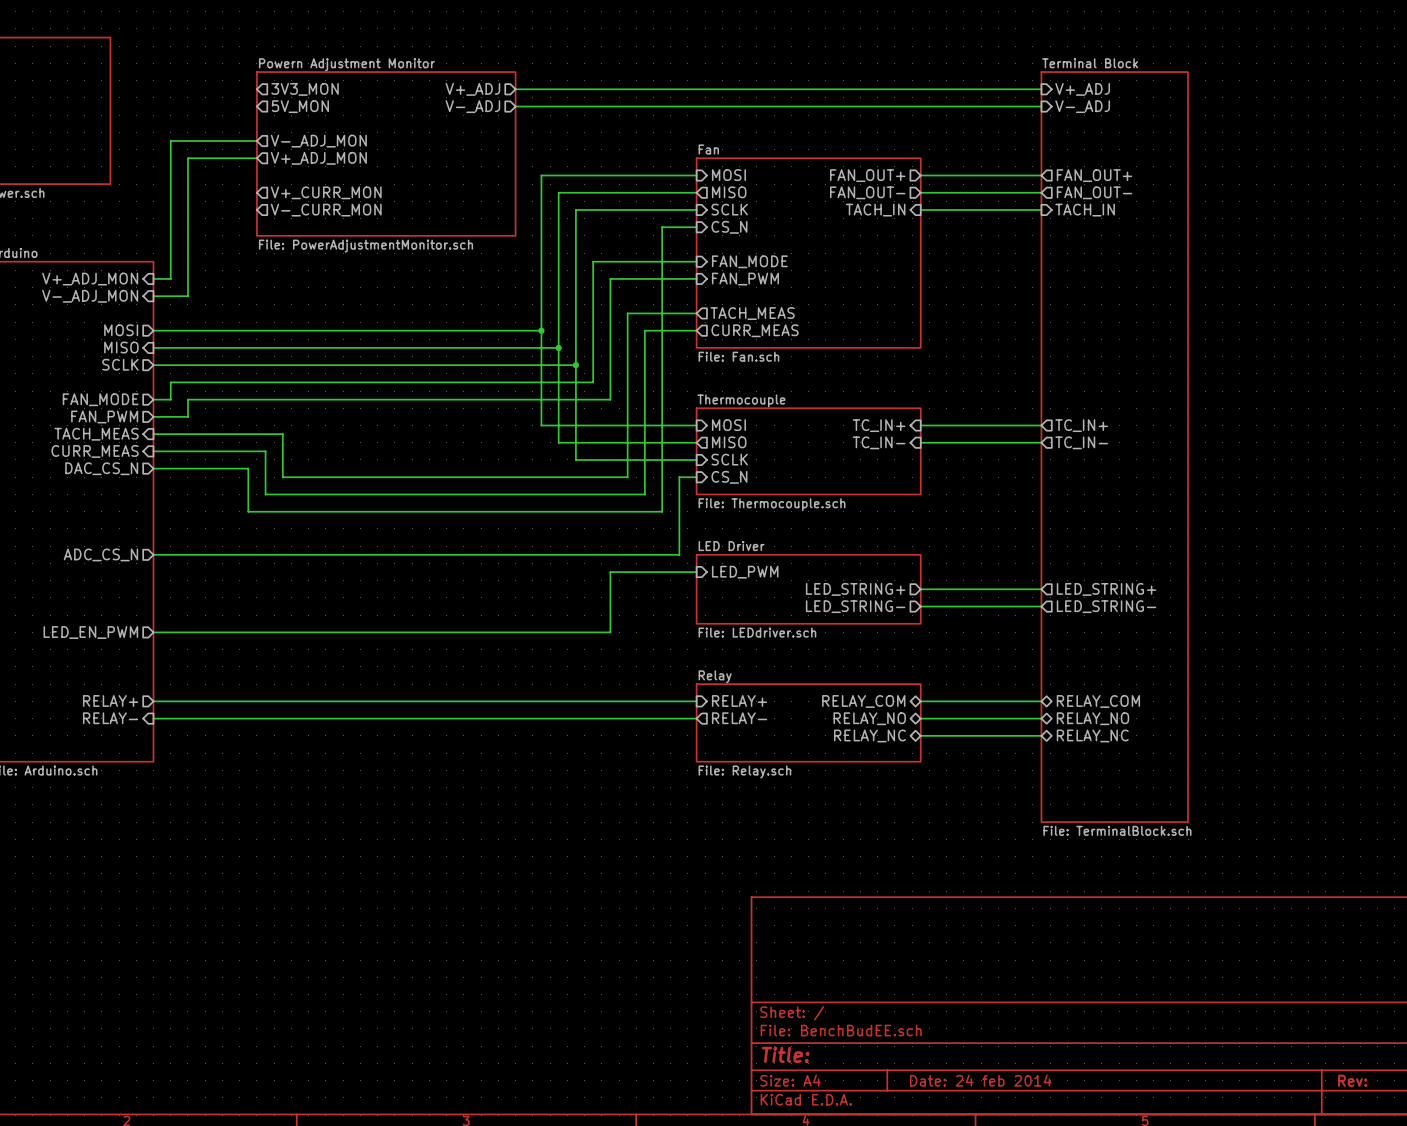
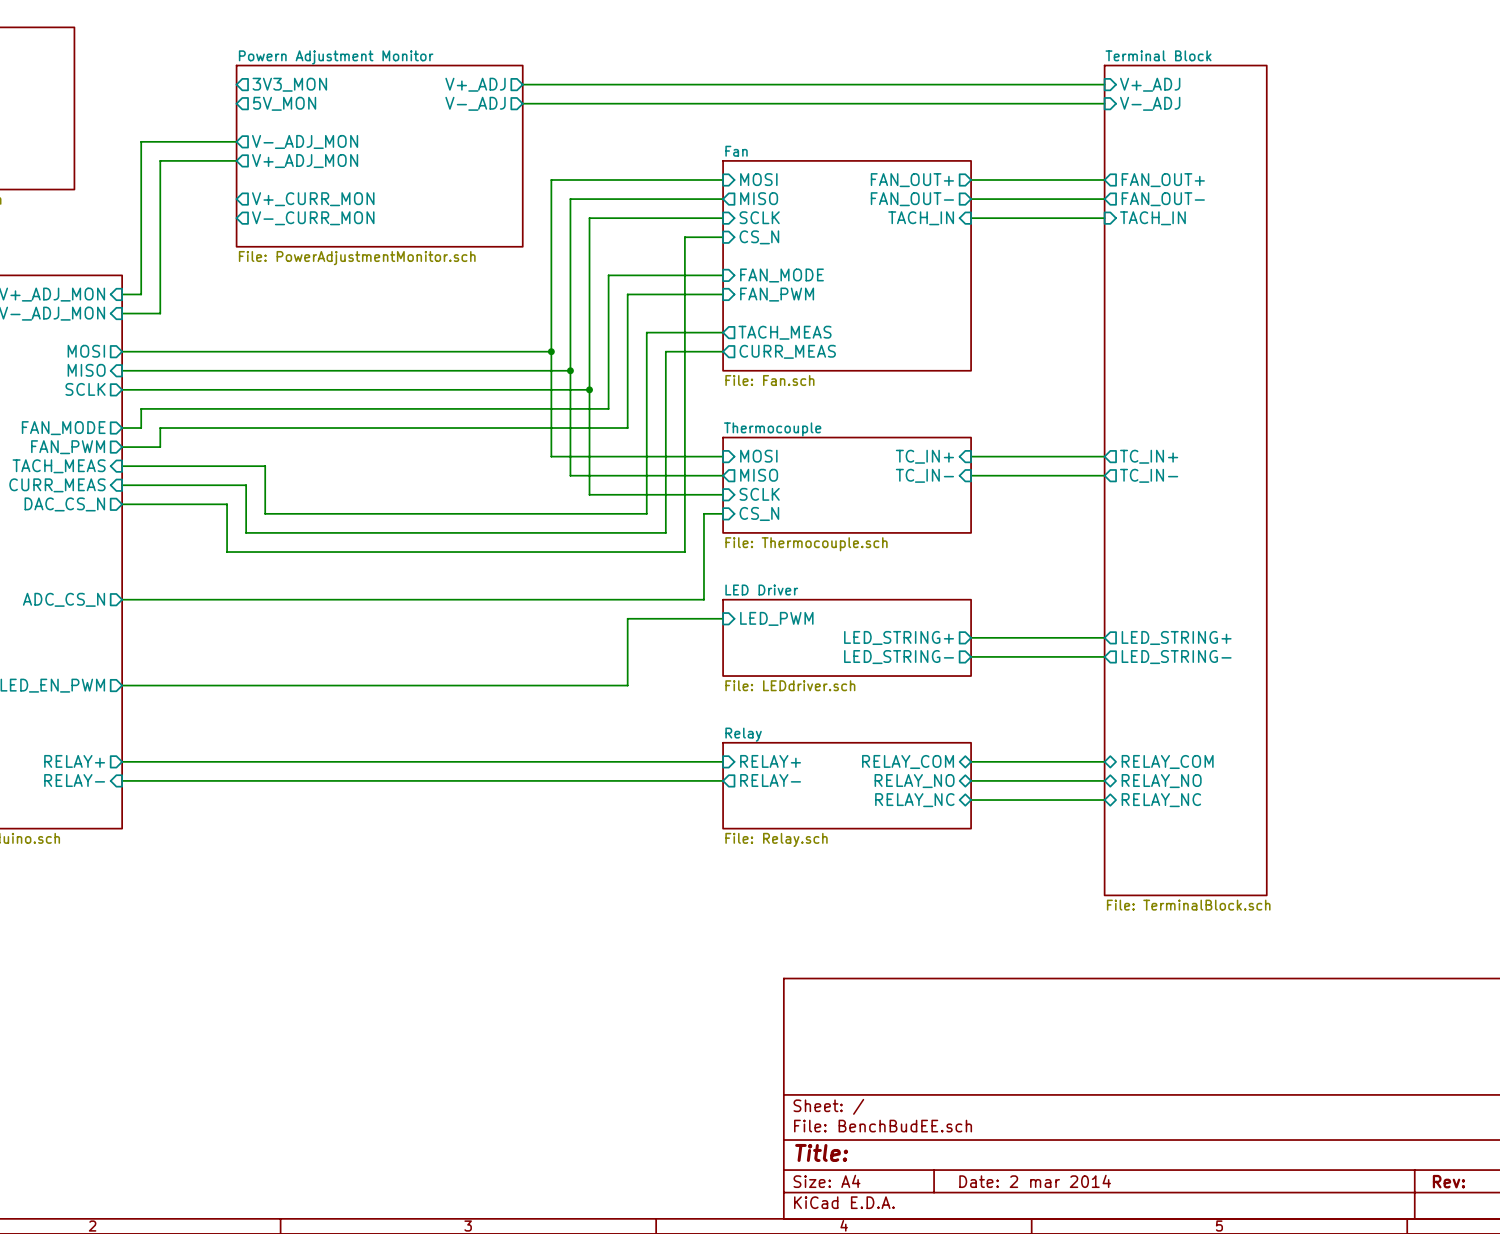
title block: Date: 24 feb 2014 (980, 1080) -> Date: 2 mar 2014 (1035, 1181)

